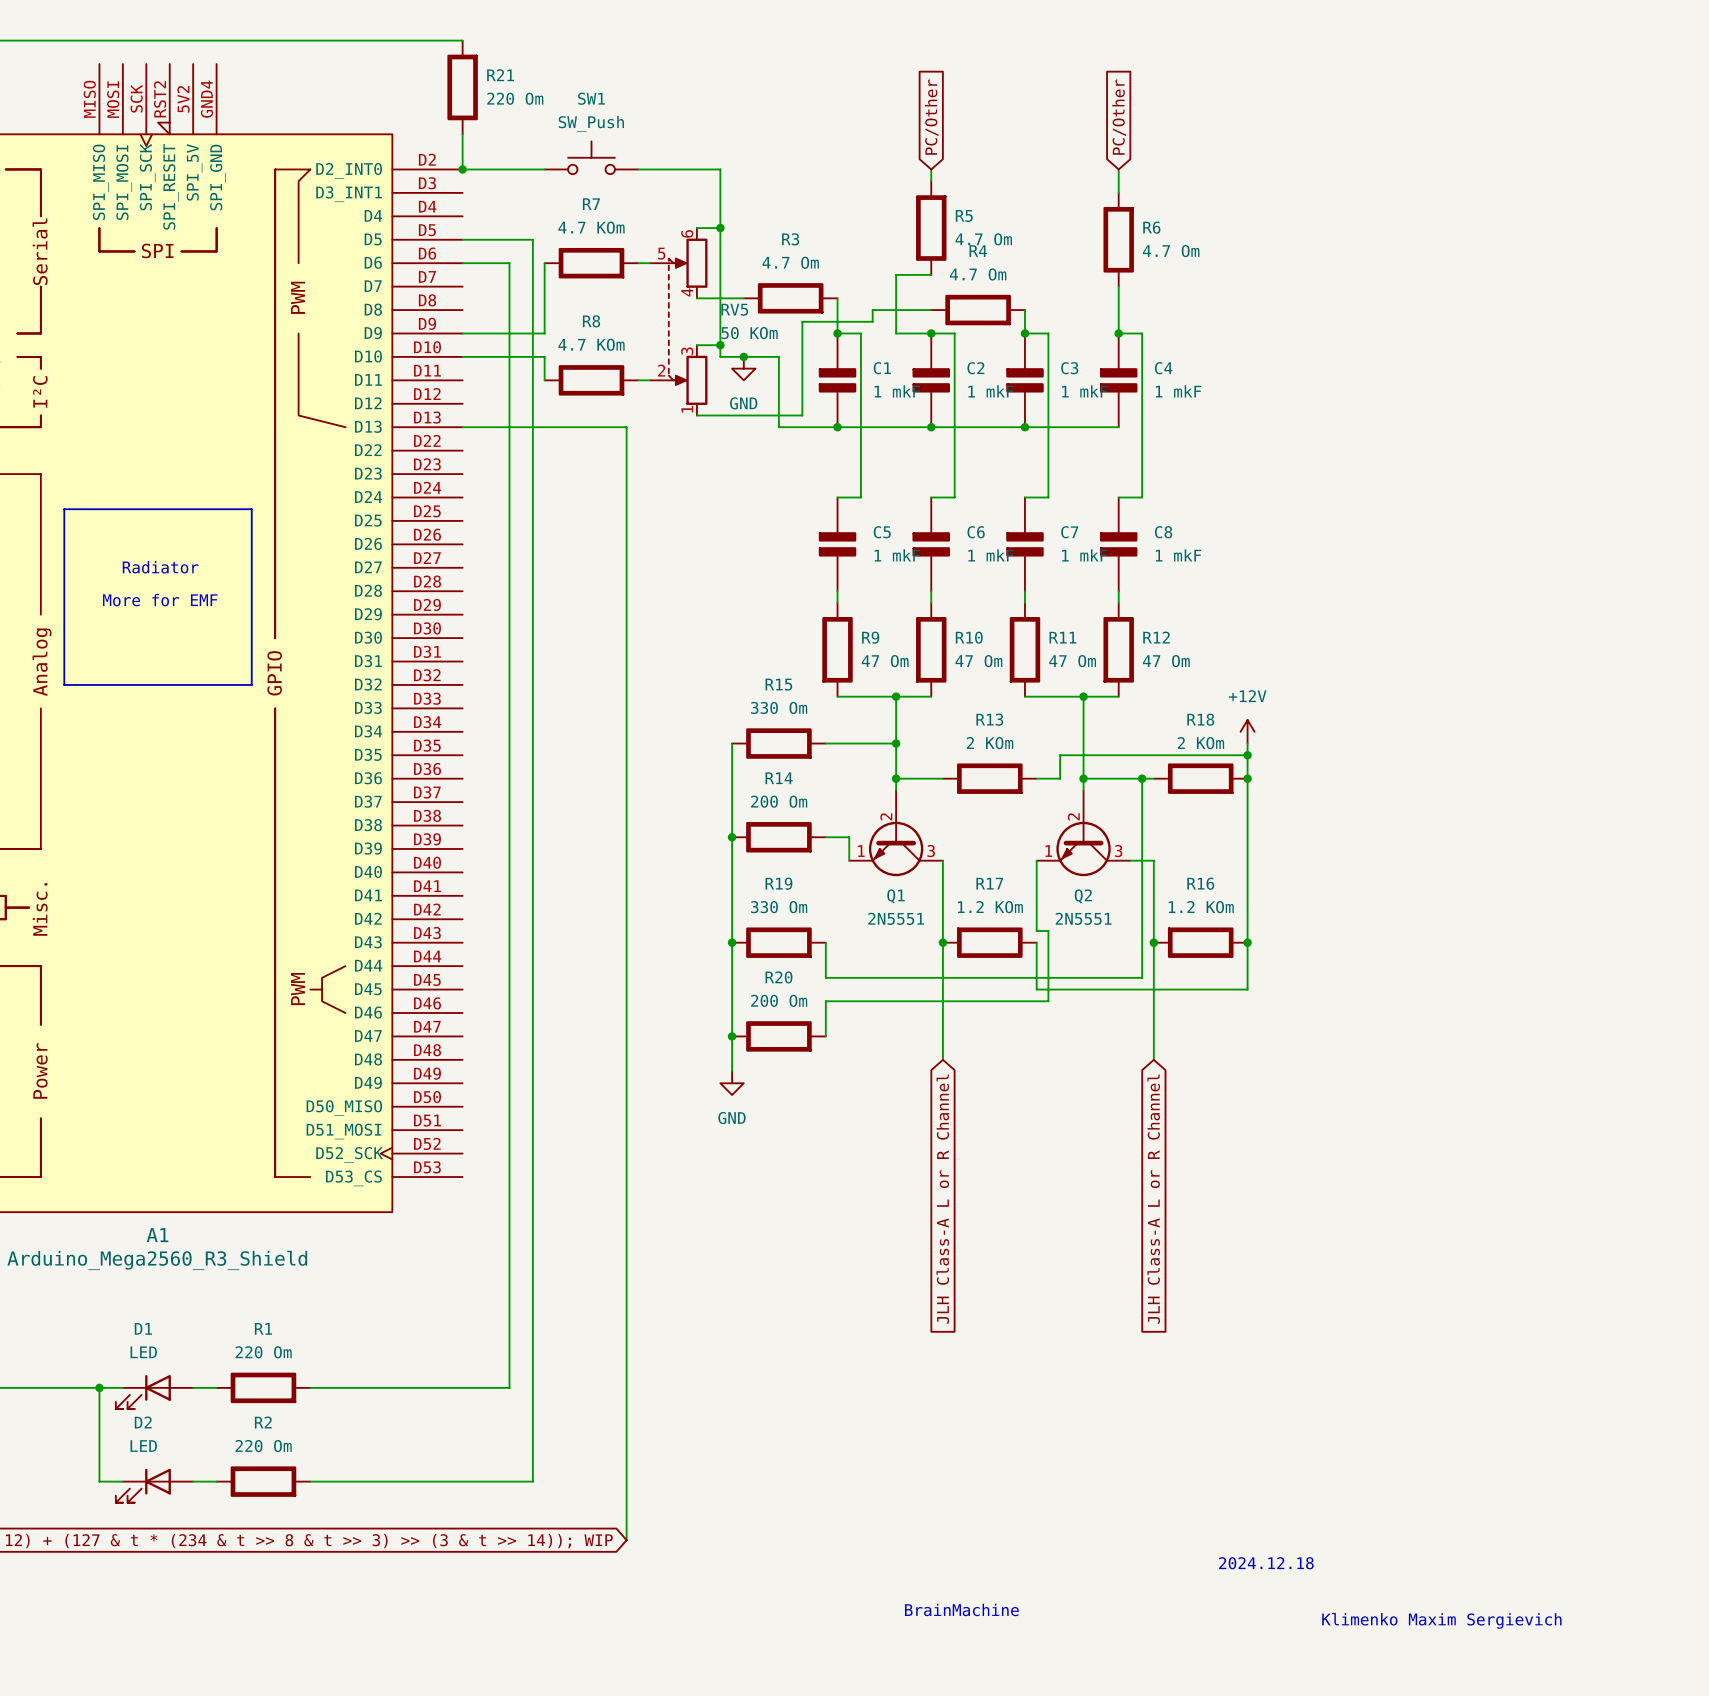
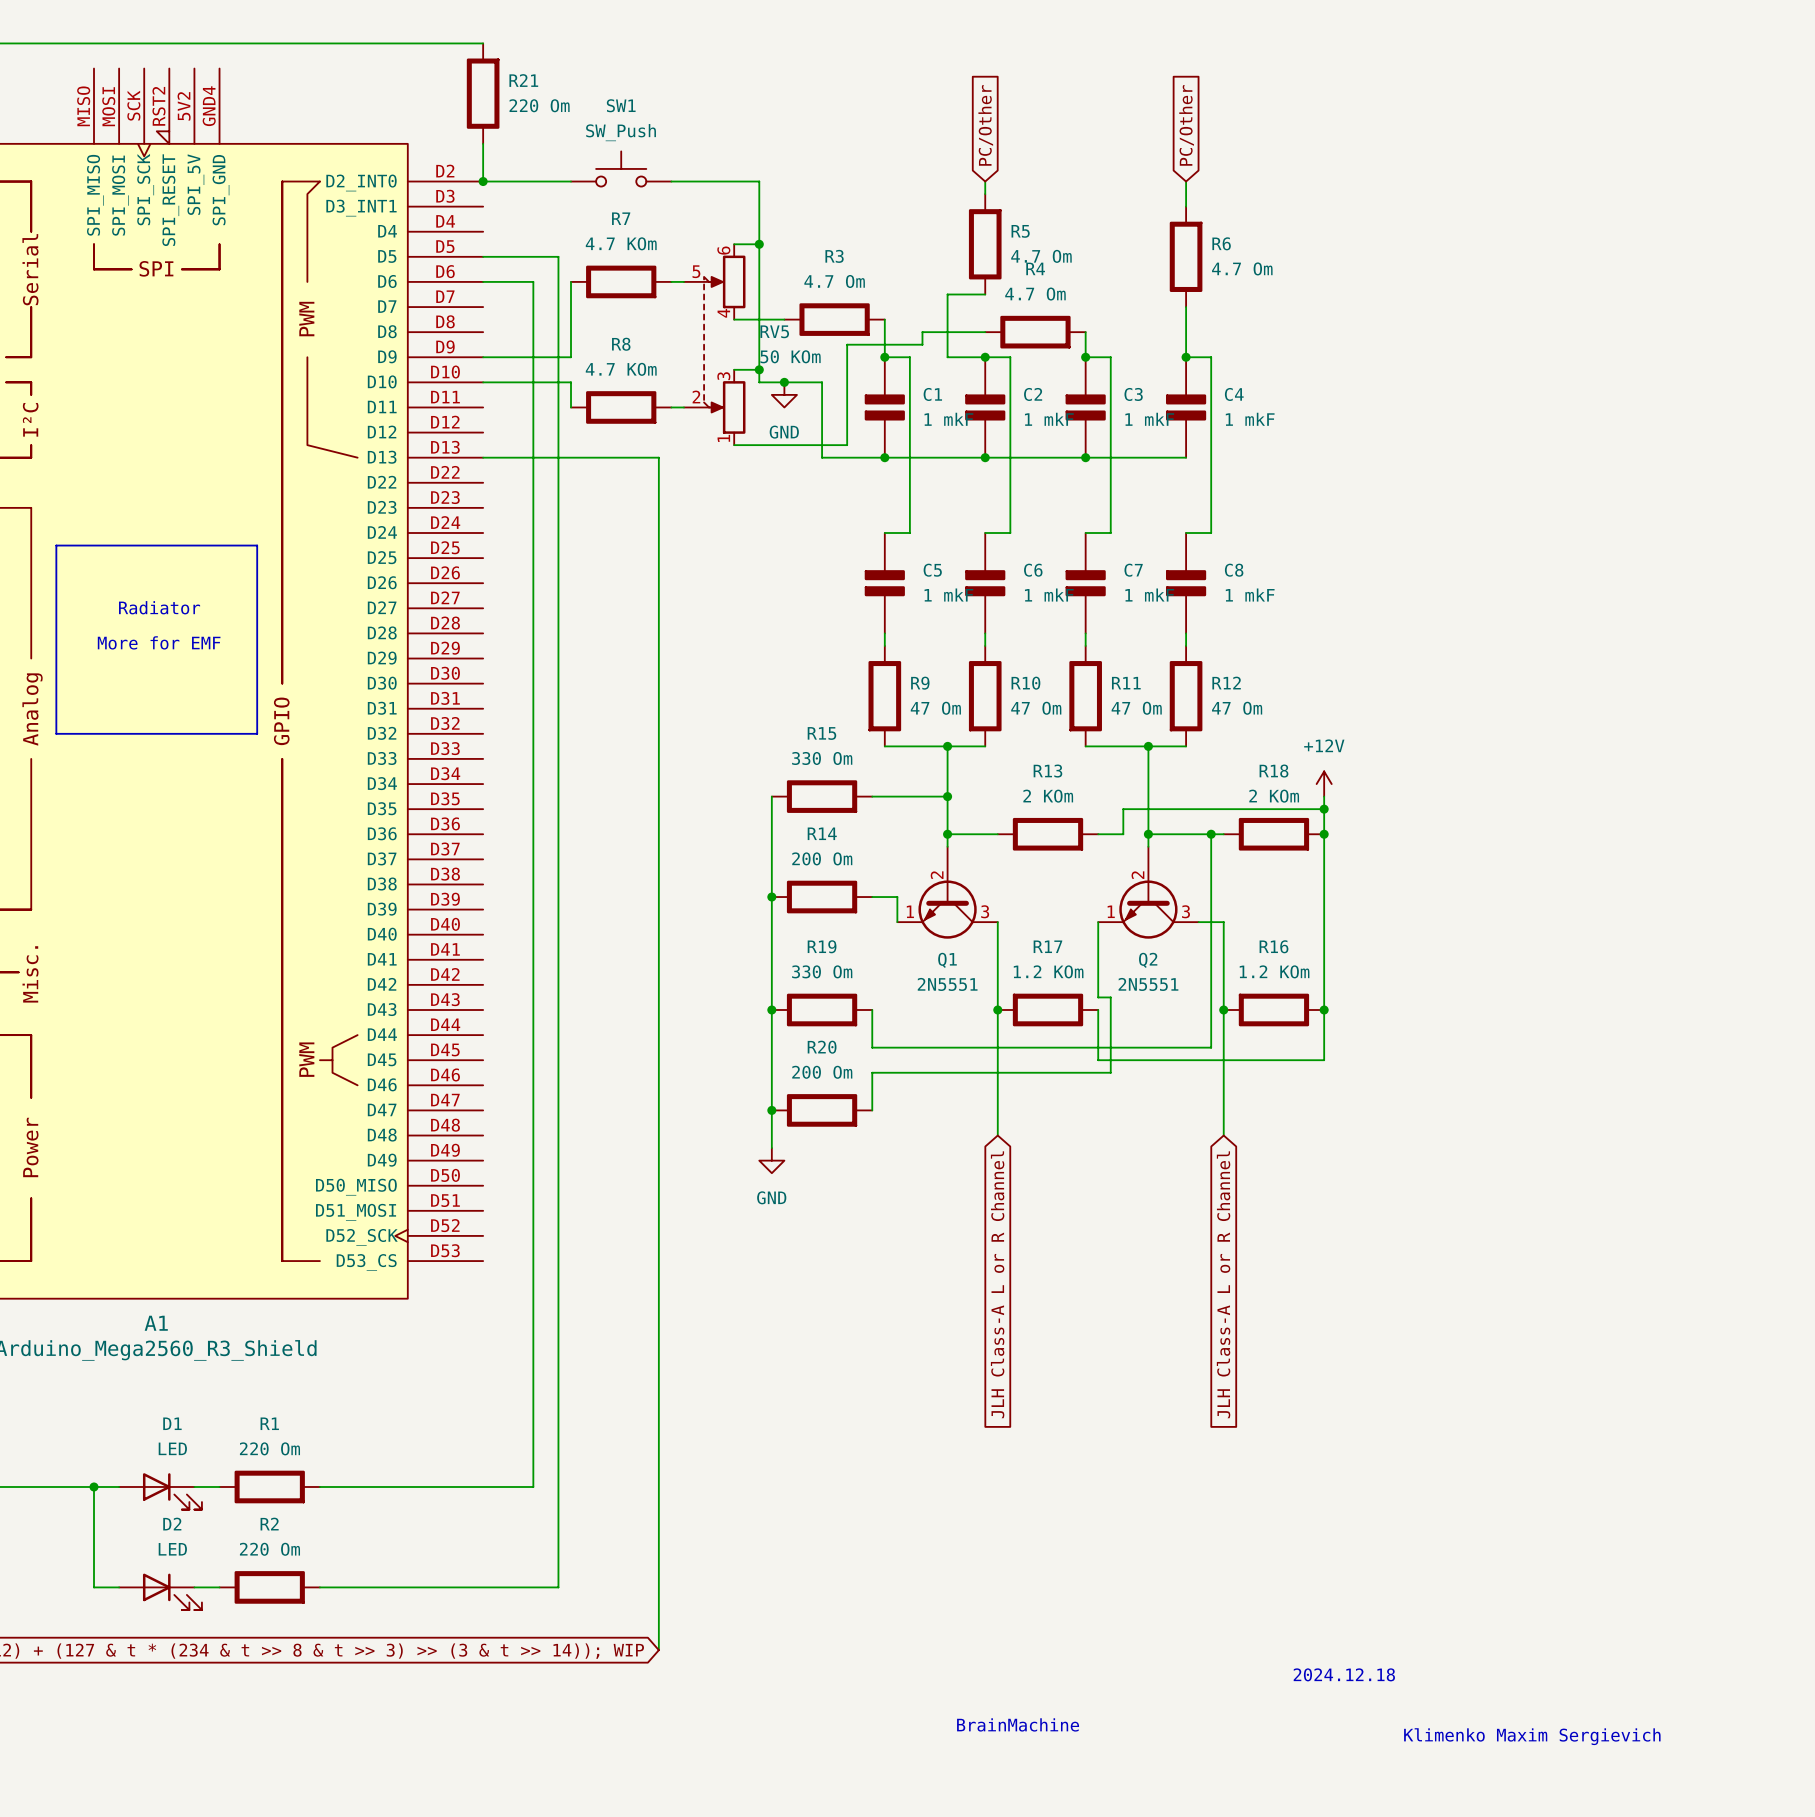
D1 flip: as is (143, 1391) -> left-right (172, 1491)
D2 flip: as is (143, 1485) -> left-right (172, 1591)

